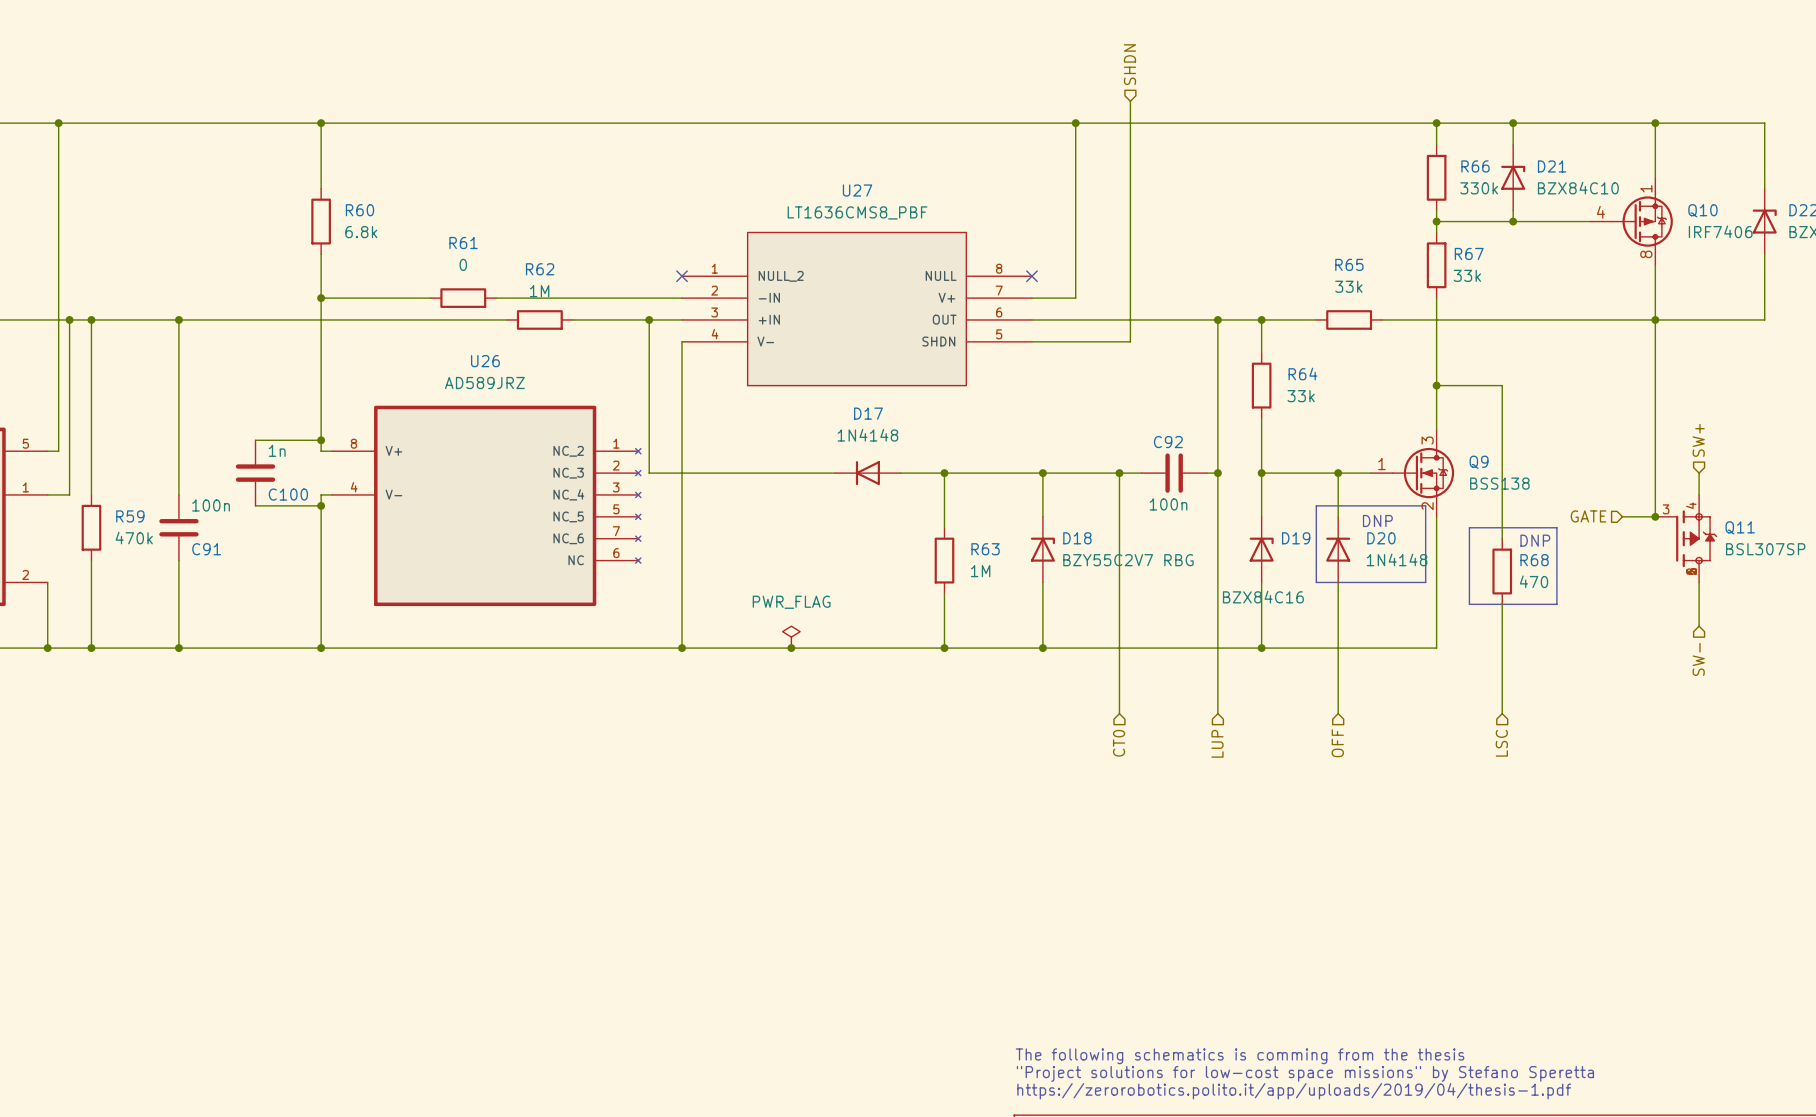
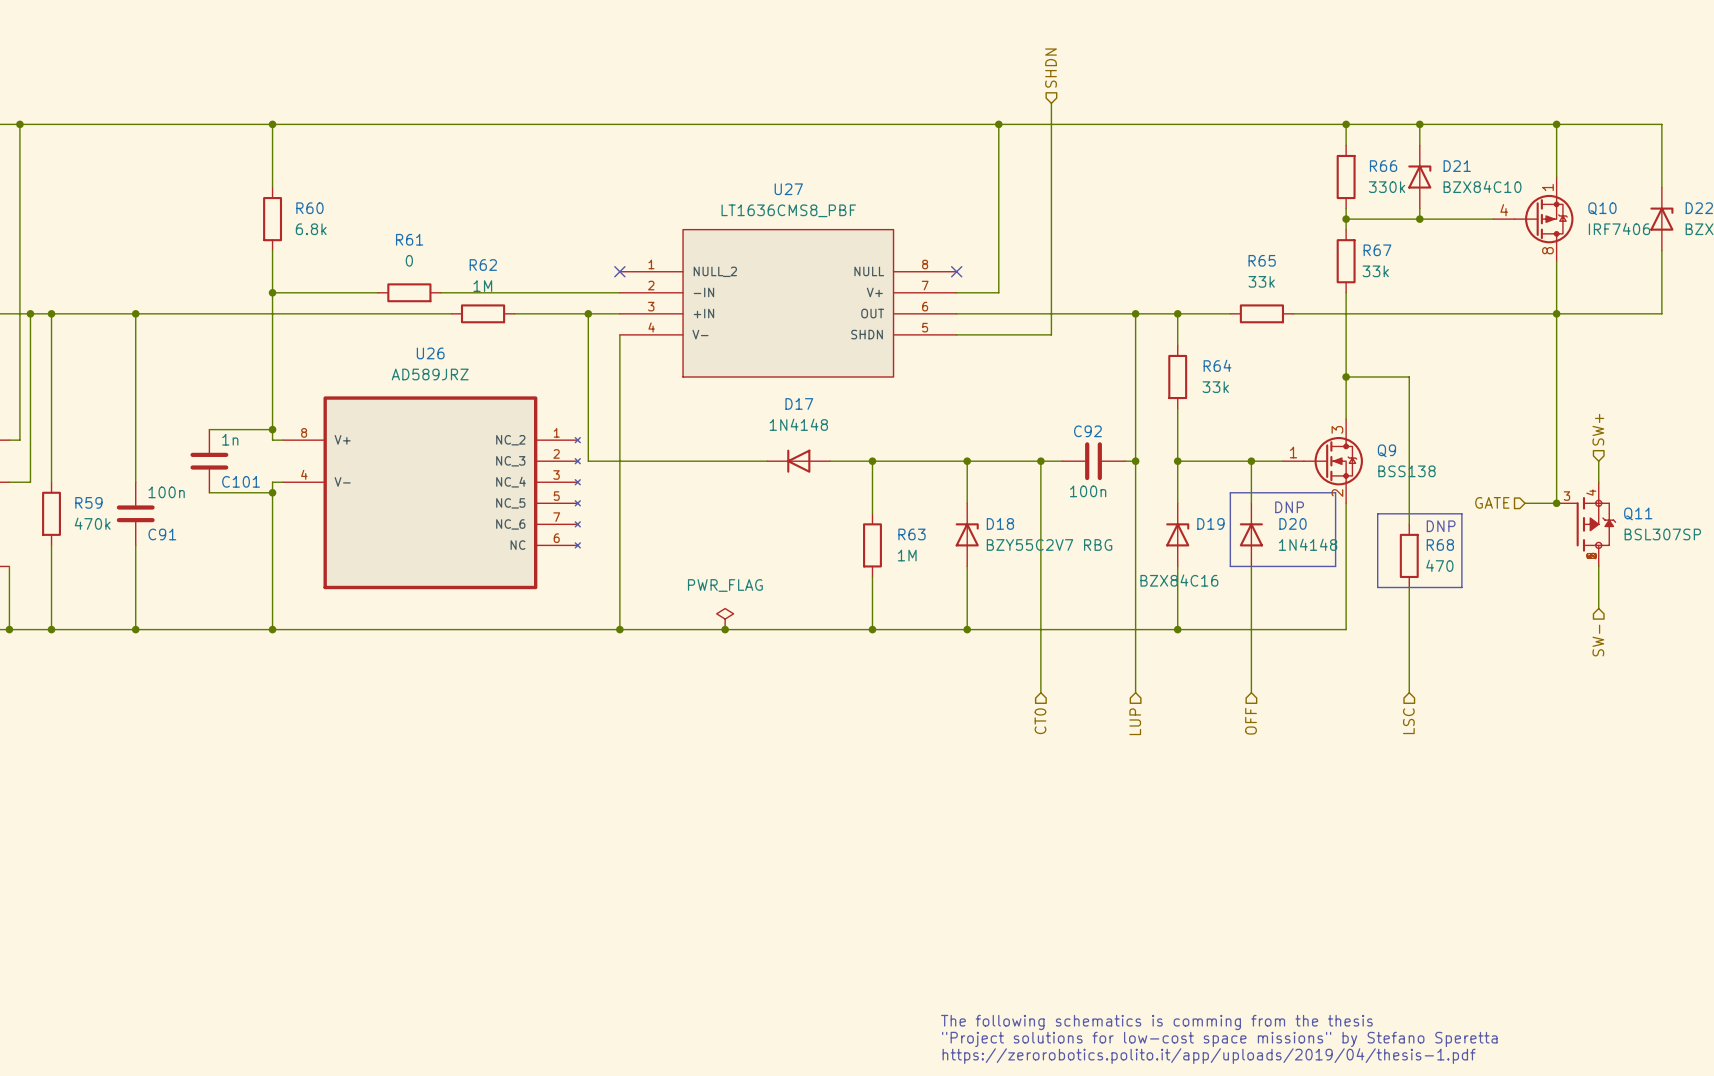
C100 name: C100 (288, 494) -> C101 (241, 481)

